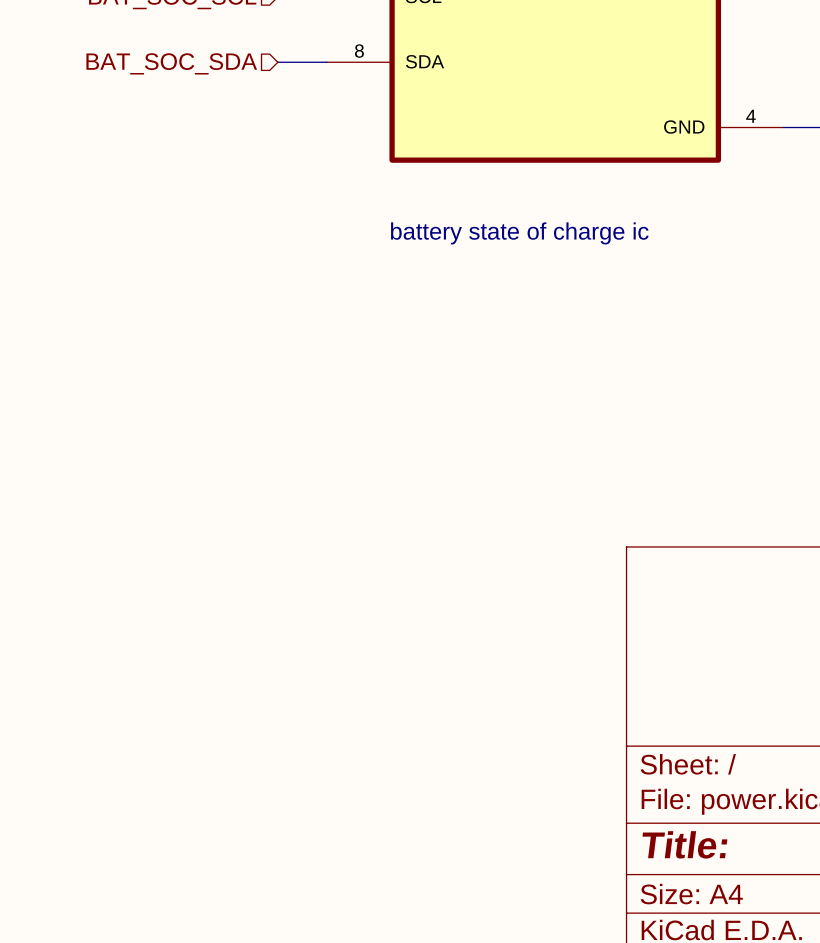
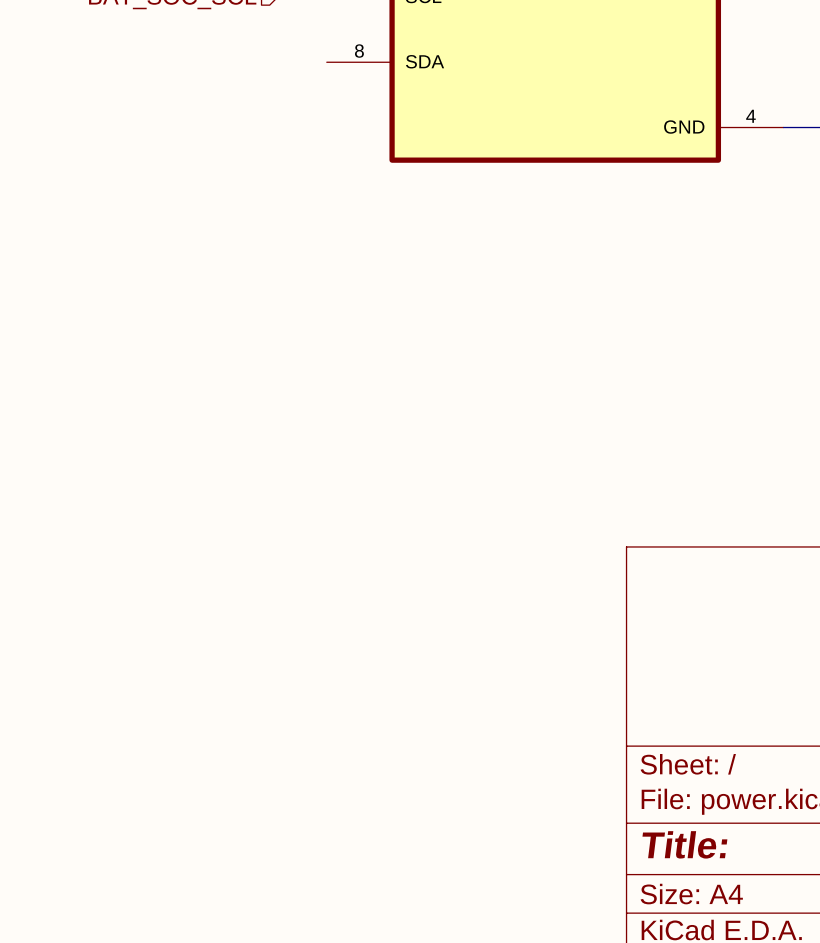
wire: (277, 62) (326, 62) -> none
hierarchical label: BAT_SOC_SDA (171, 63) -> none
text: battery state of charge ic (519, 233) -> none

